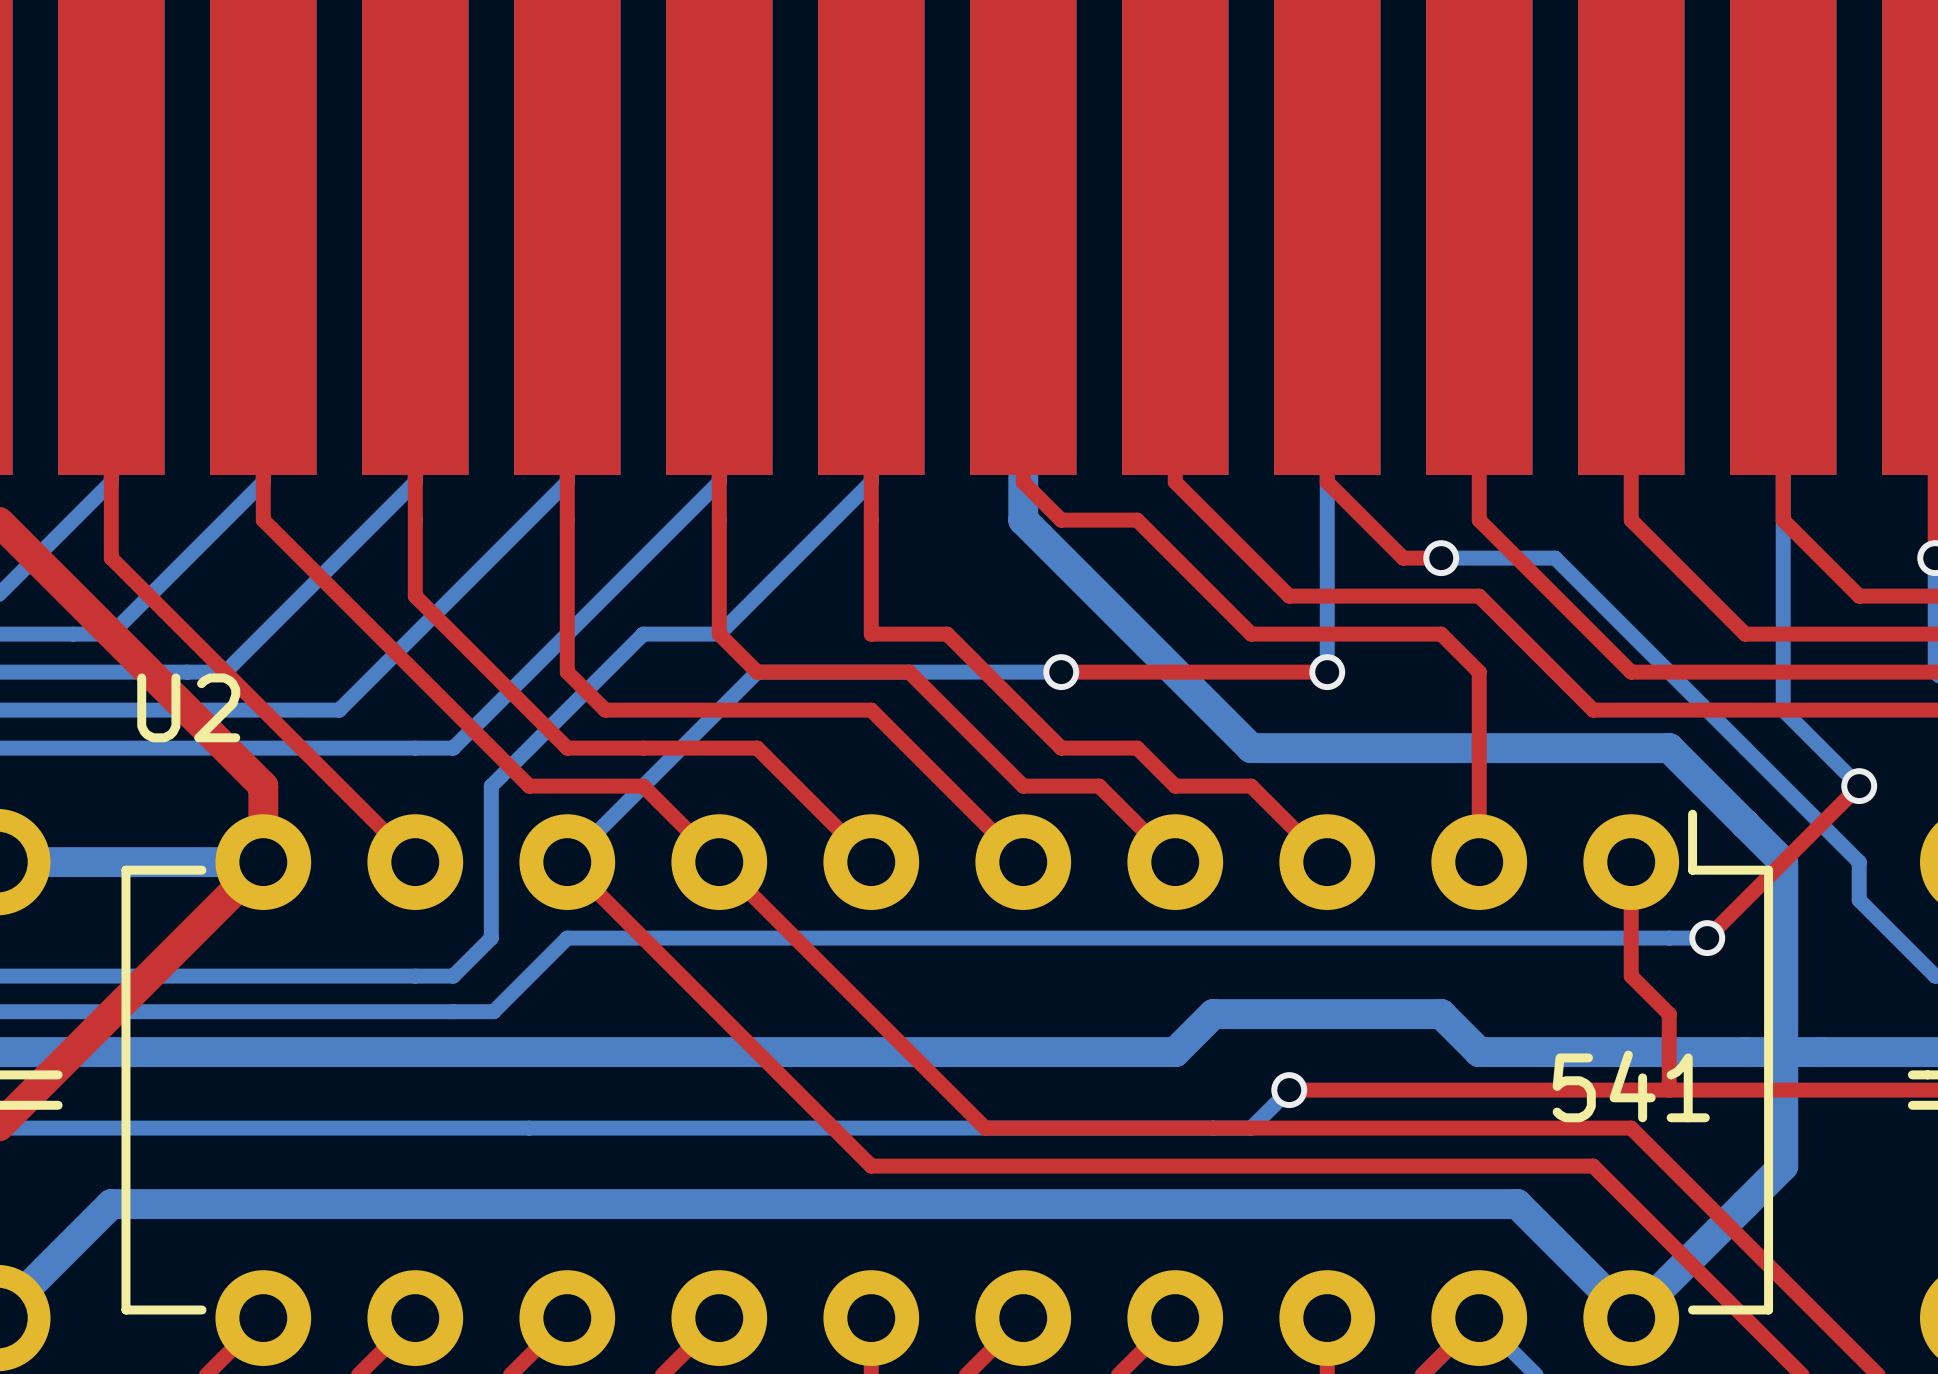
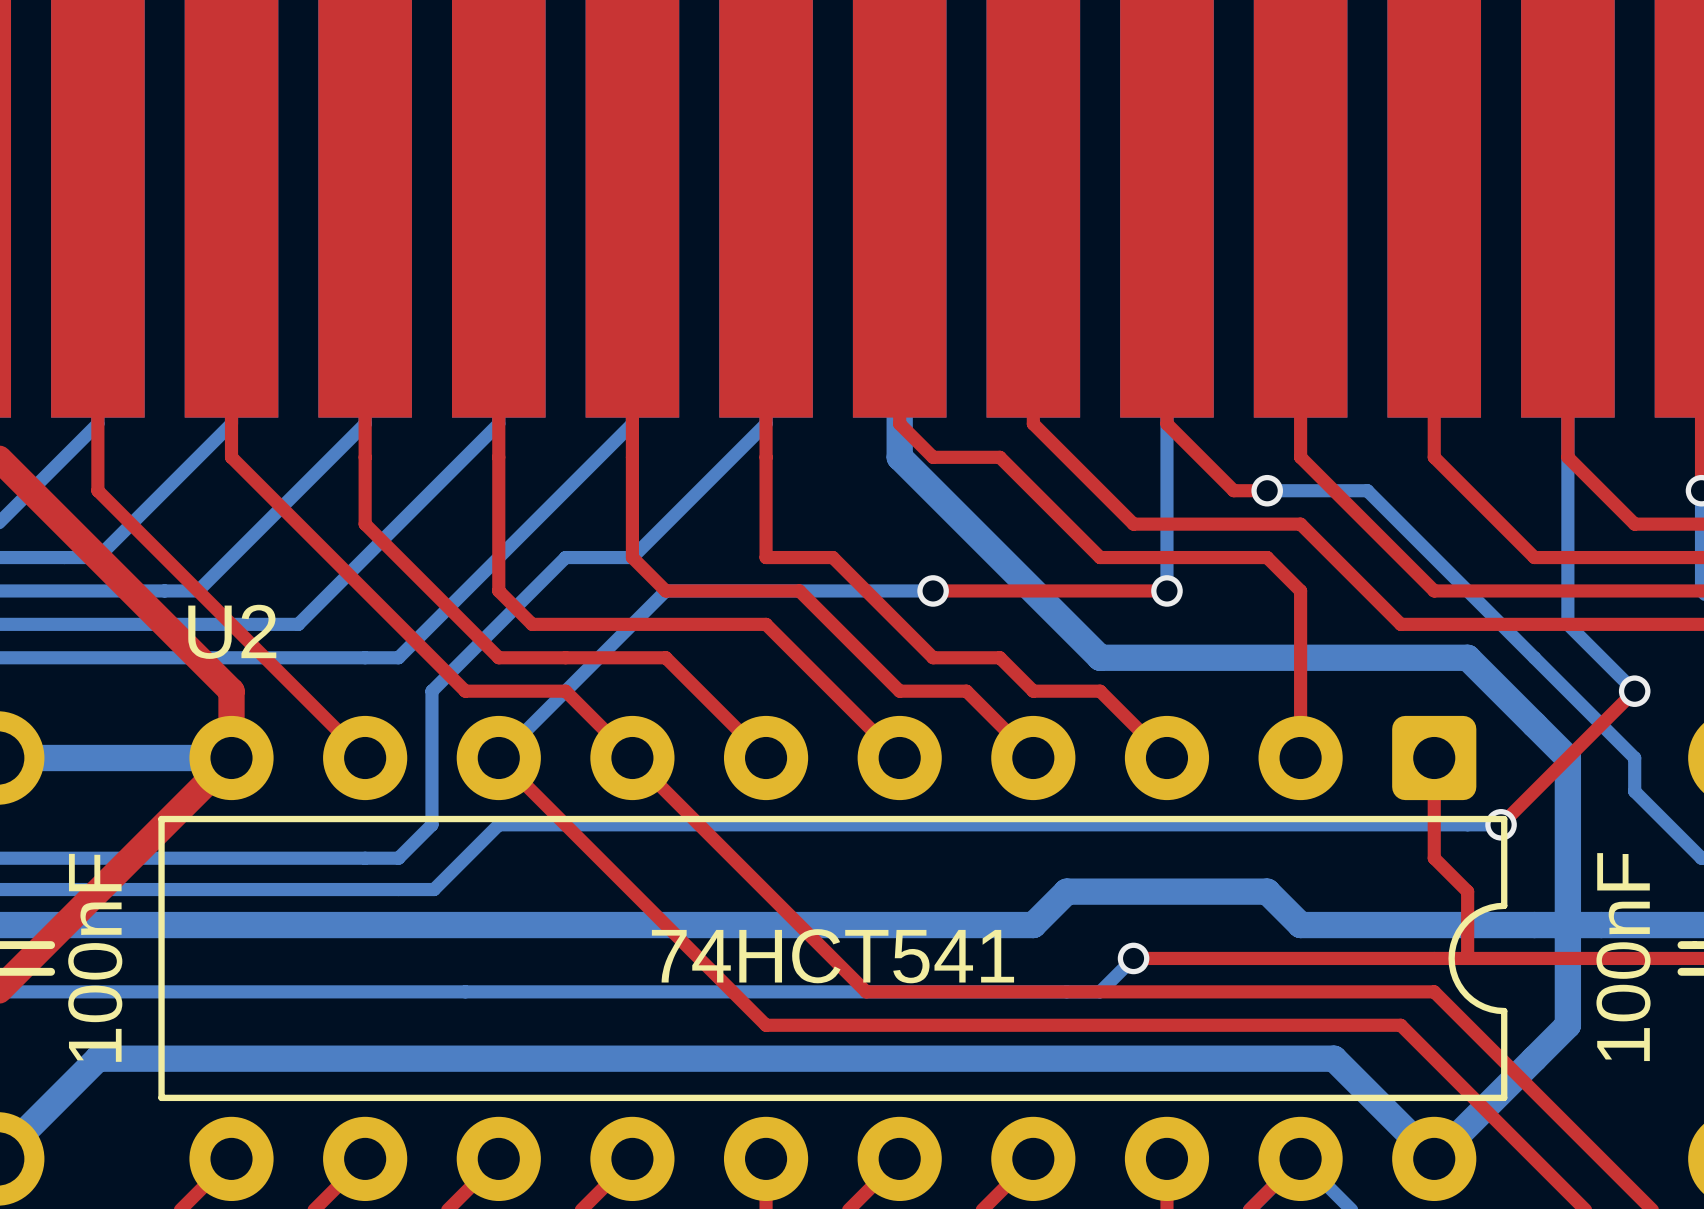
U2 footprint: [121, 809, 1774, 1366] -> [158, 715, 1508, 1202]
U2 value: 541 (1631, 1086) -> 74HCT541 (832, 956)
part value: none -> 100nF (1623, 957)
part value: none -> 100nF (95, 957)

